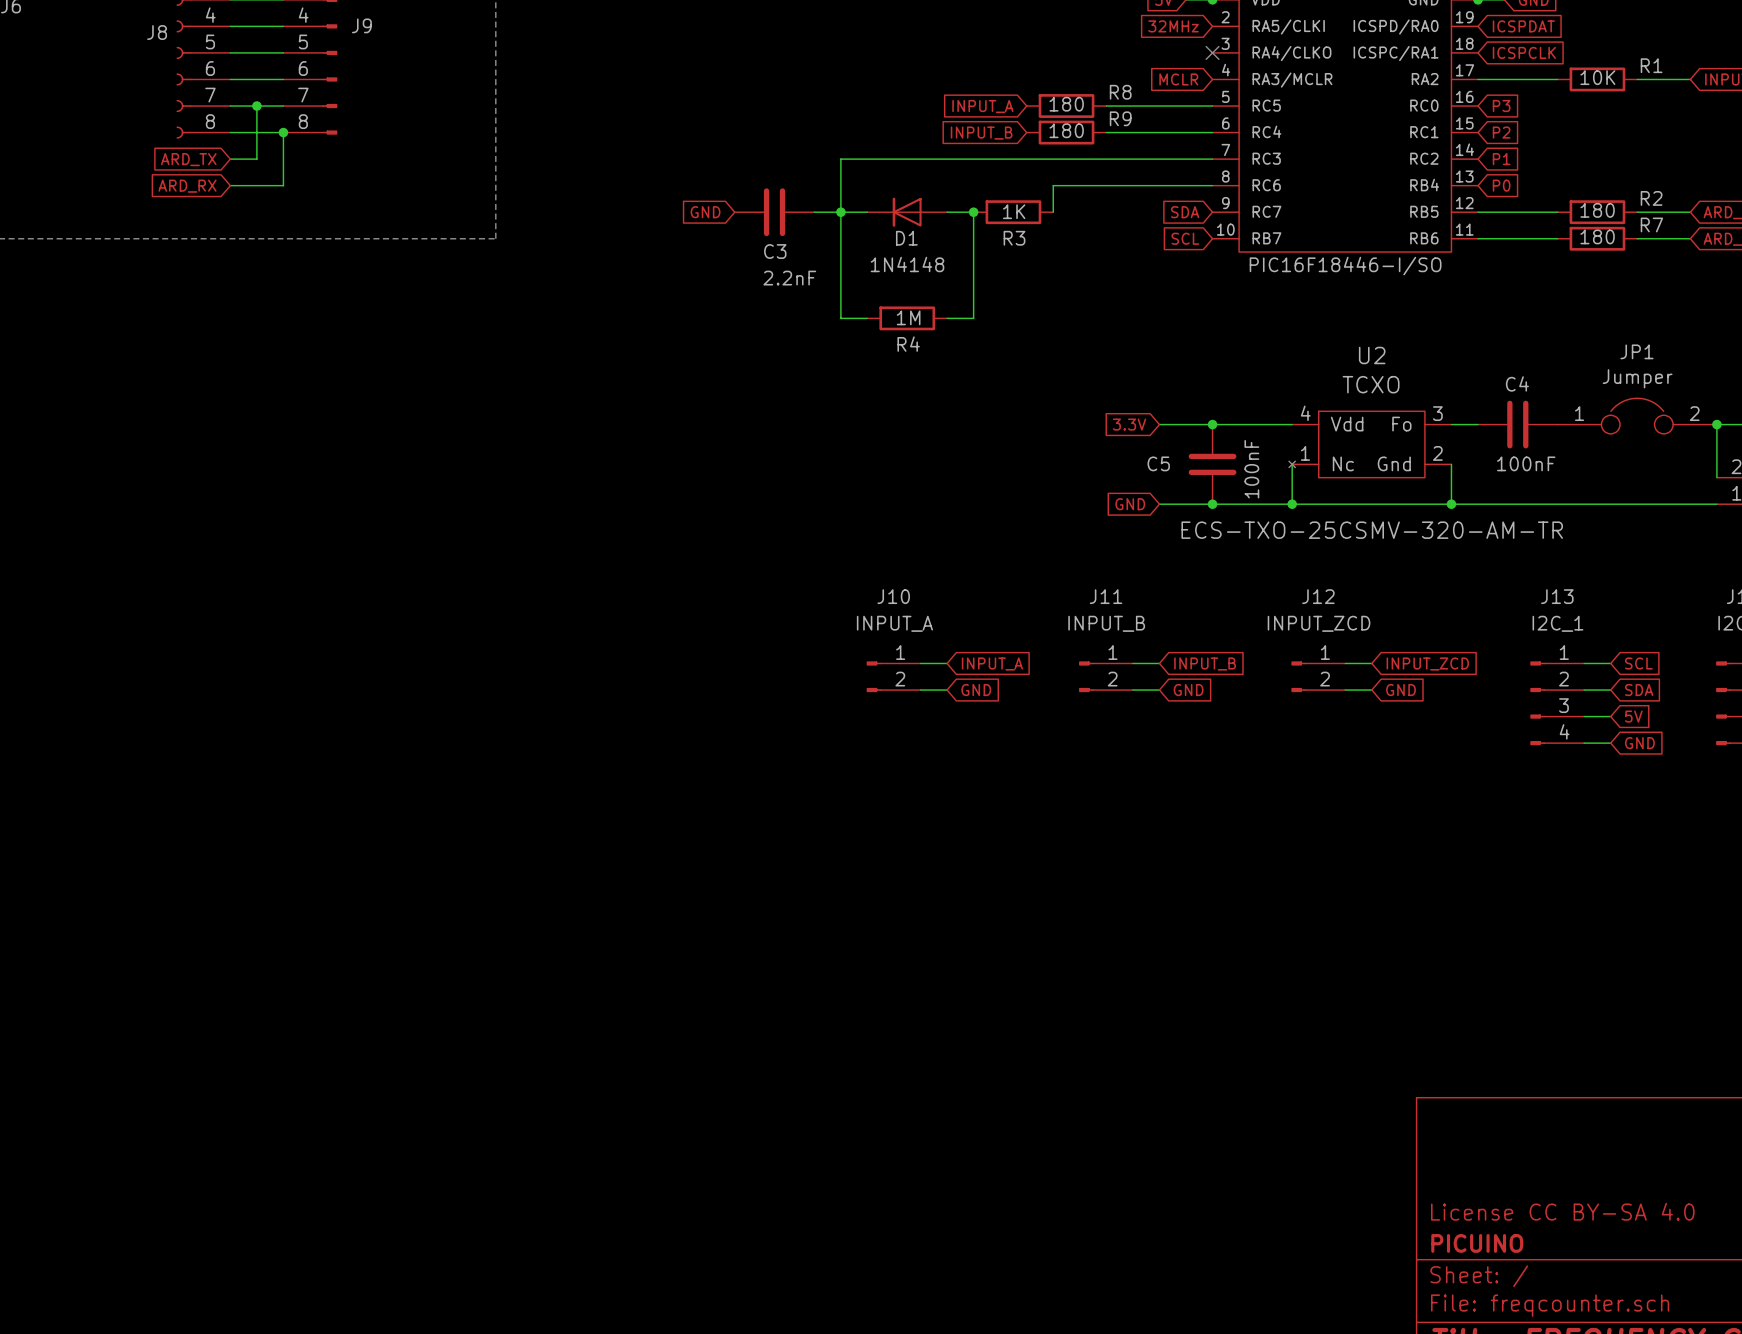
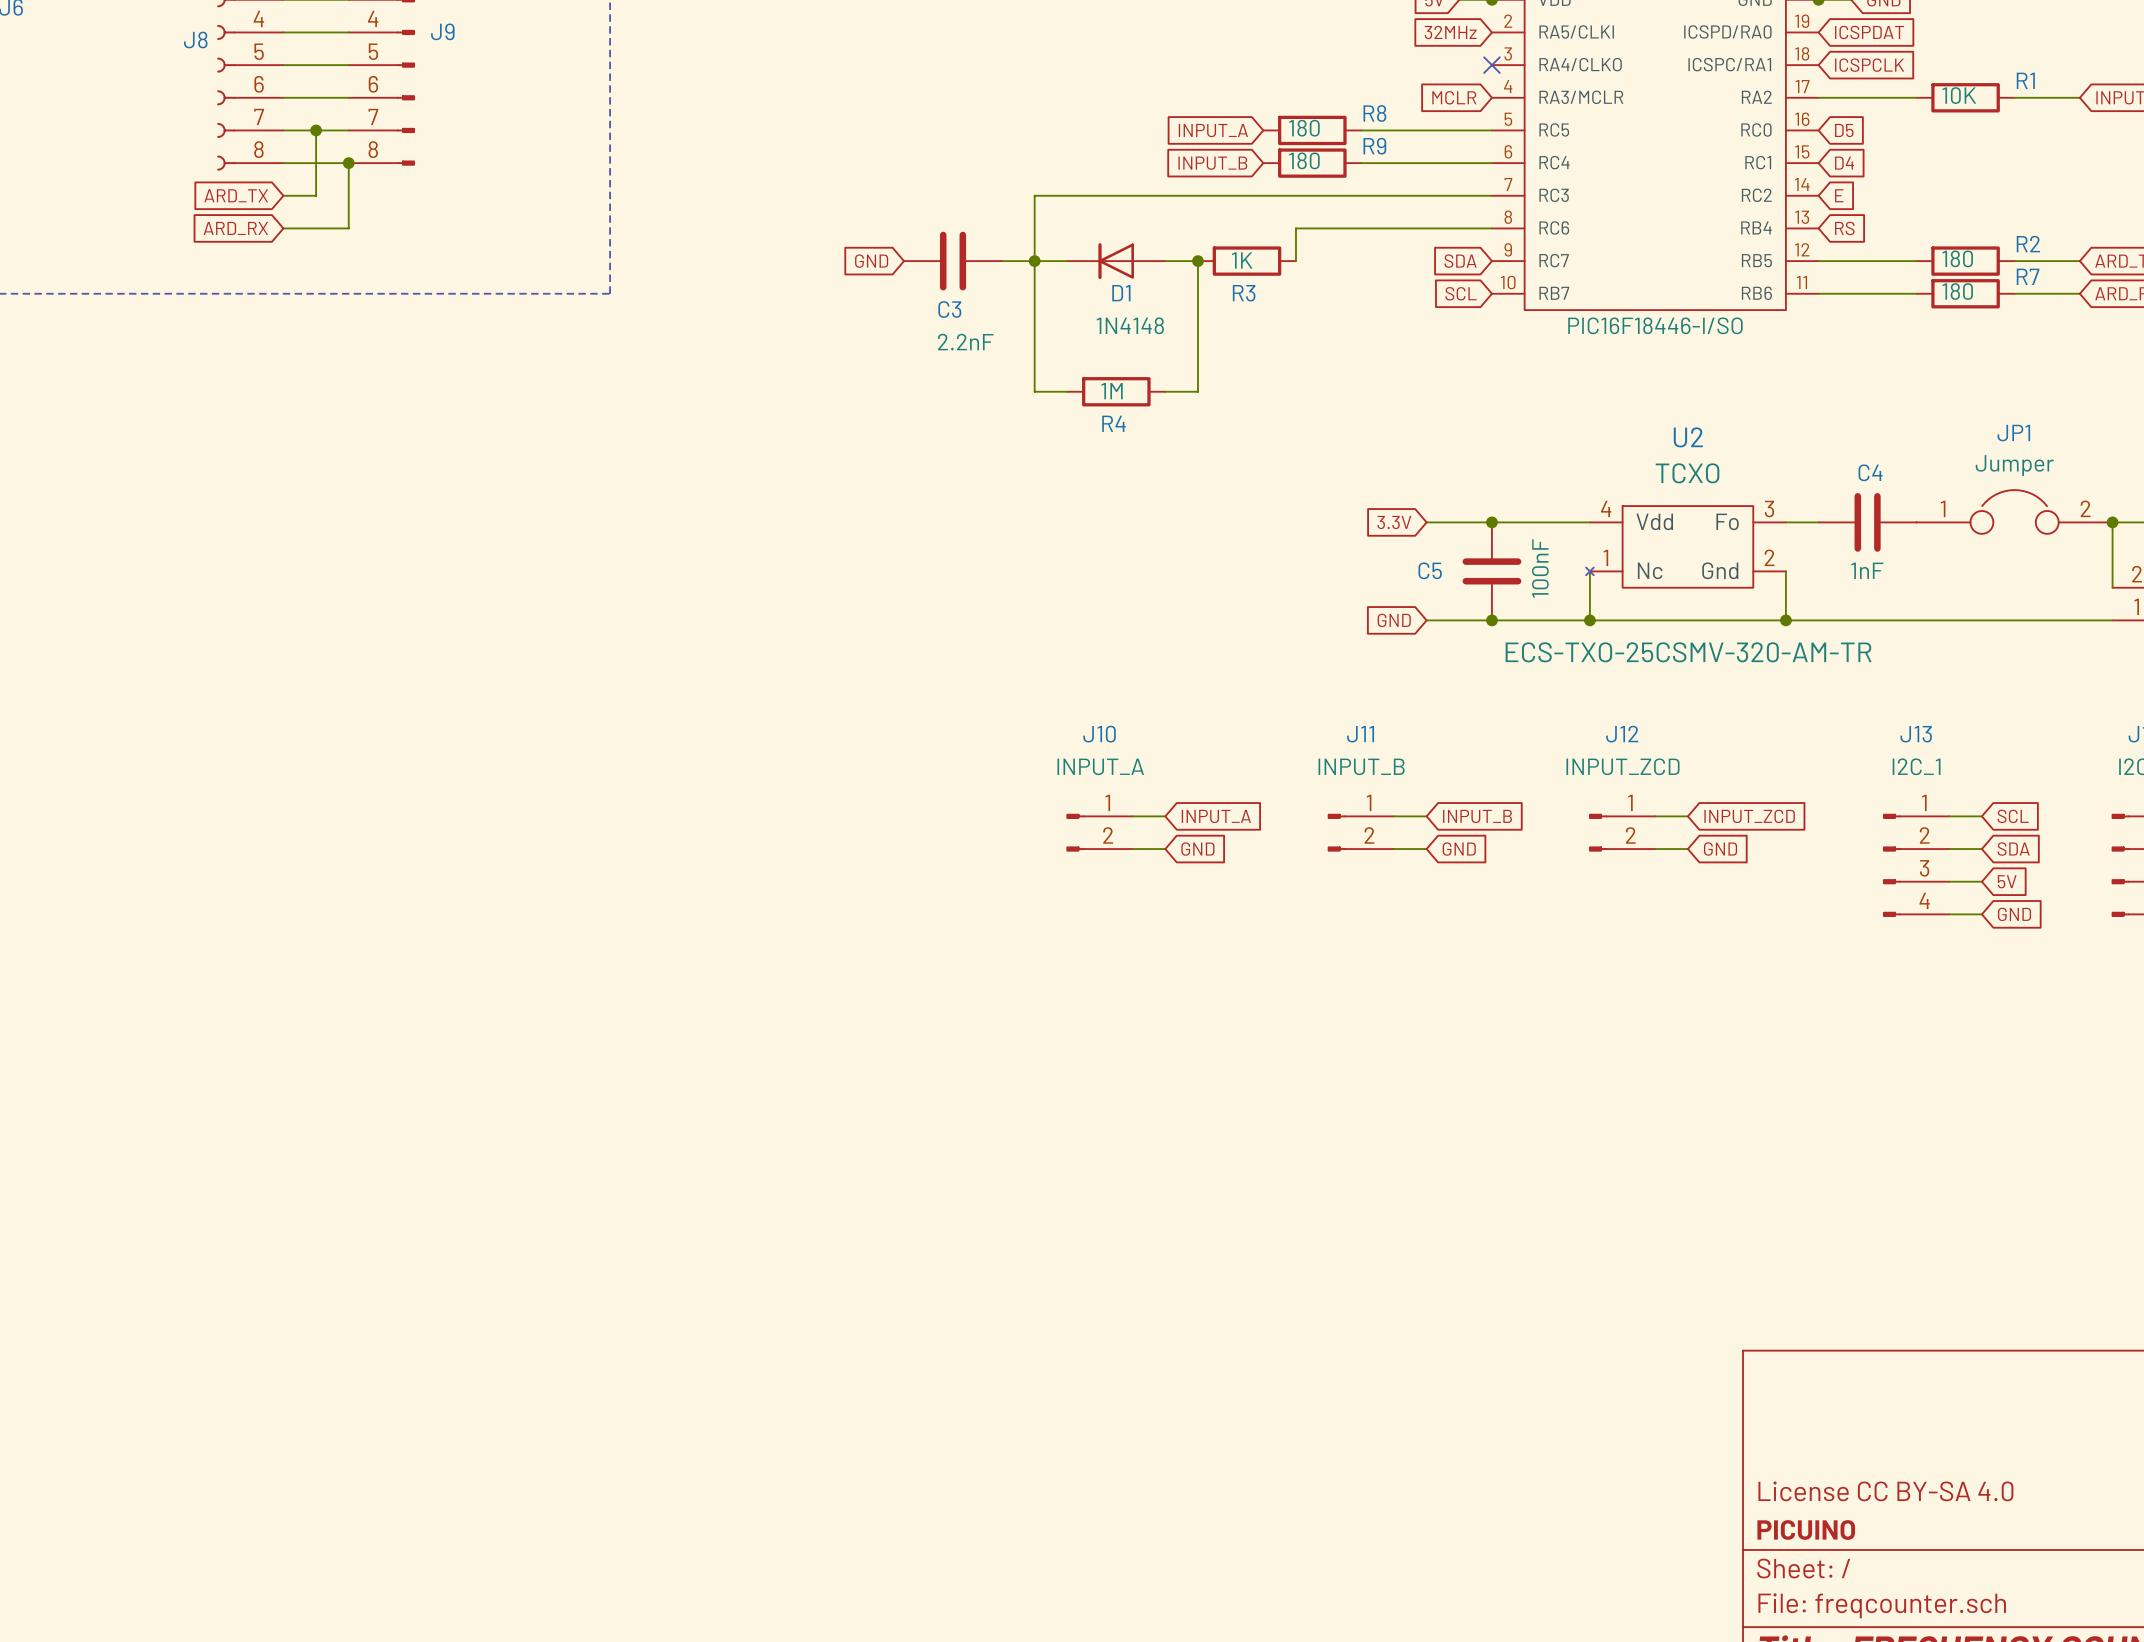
global label: P3 (1501, 106) -> D5 (1844, 130)
global label: P2 (1501, 132) -> D4 (1844, 163)
global label: P1 (1501, 159) -> E (1839, 195)
global label: P0 (1501, 185) -> RS (1844, 228)
C4 value: 100nF (1526, 463) -> 1nF (1867, 570)

